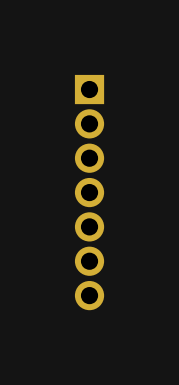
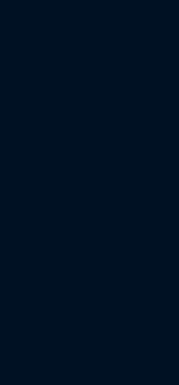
part: (89, 192) -> none

